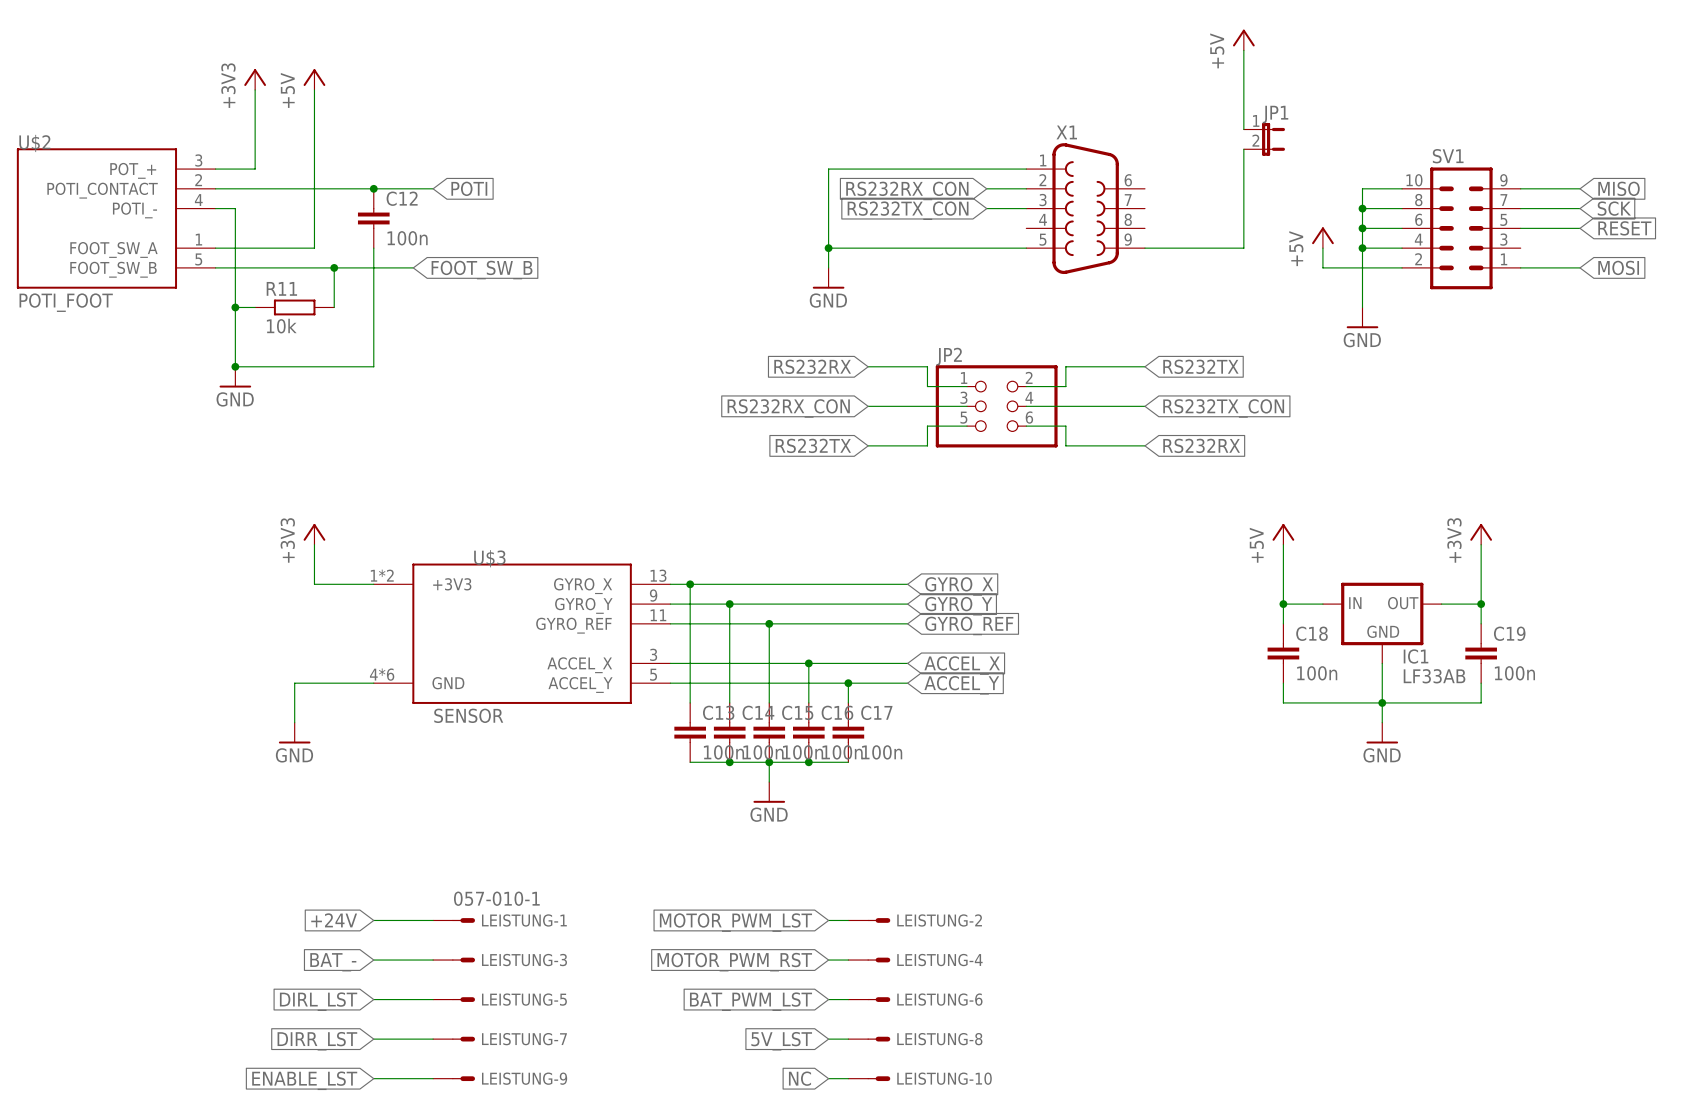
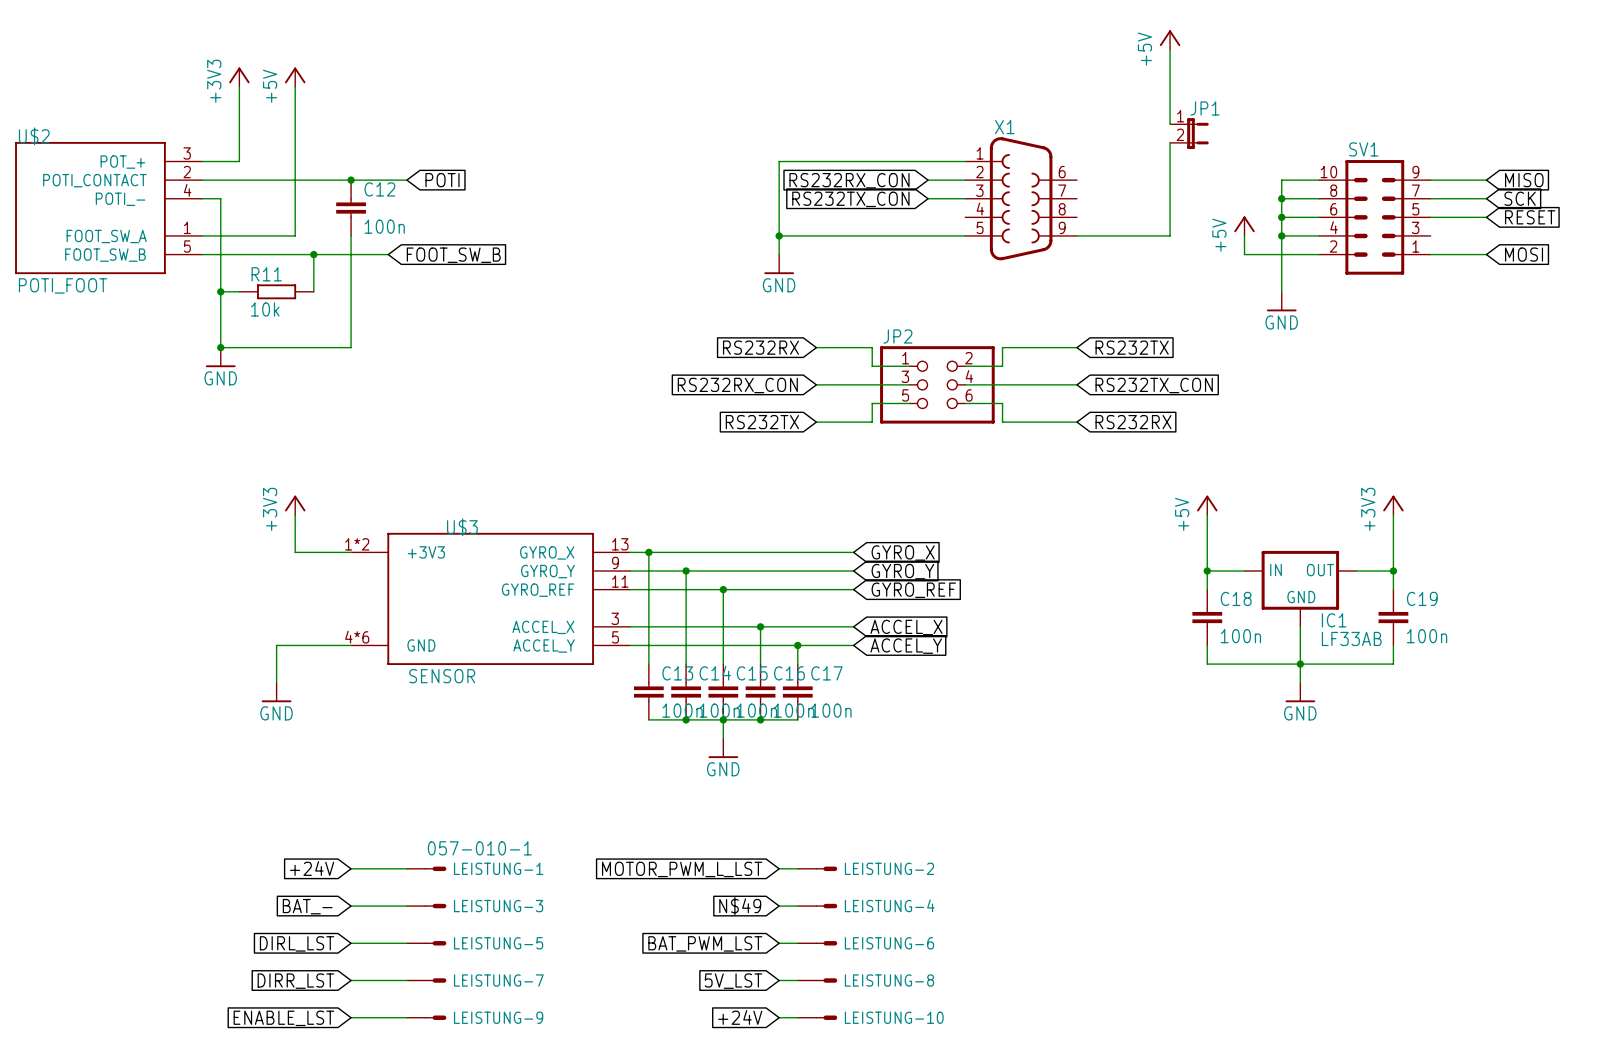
global label: MOTOR_PWM_LST (735, 922) -> MOTOR_PWM_L_LST (682, 869)
global label: MOTOR_PWM_RST (734, 962) -> N$49 (740, 906)
global label: NC (800, 1078) -> +24V (740, 1017)

